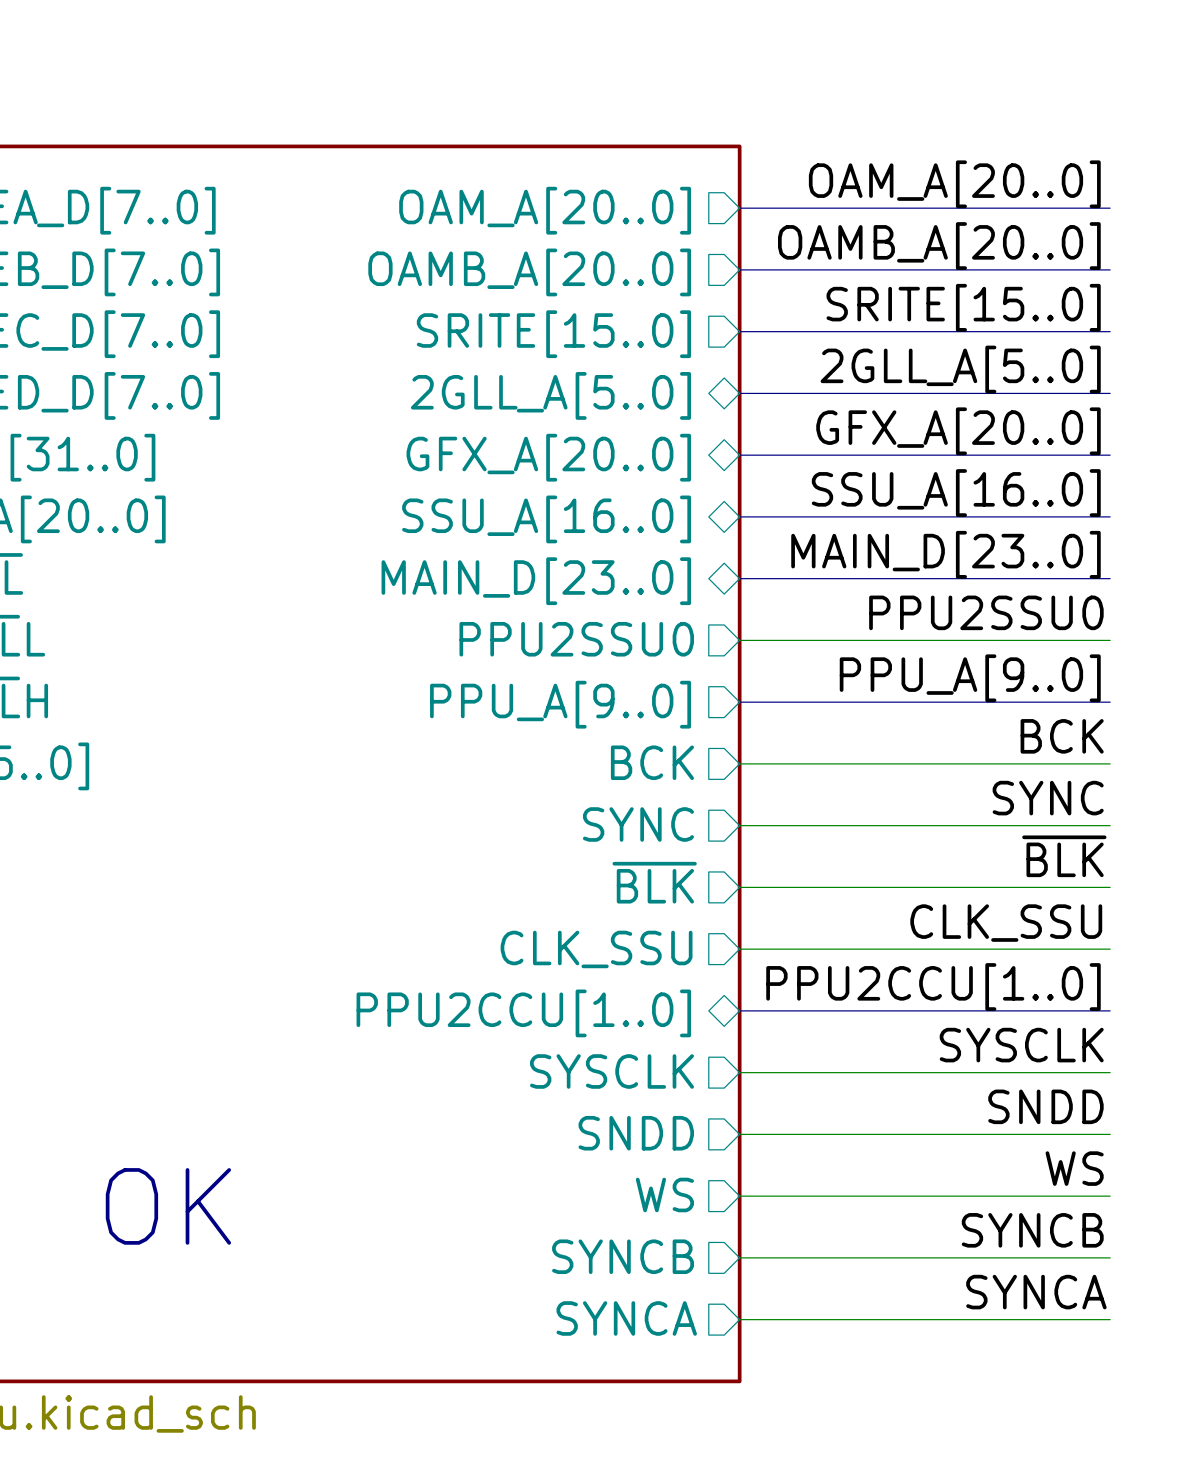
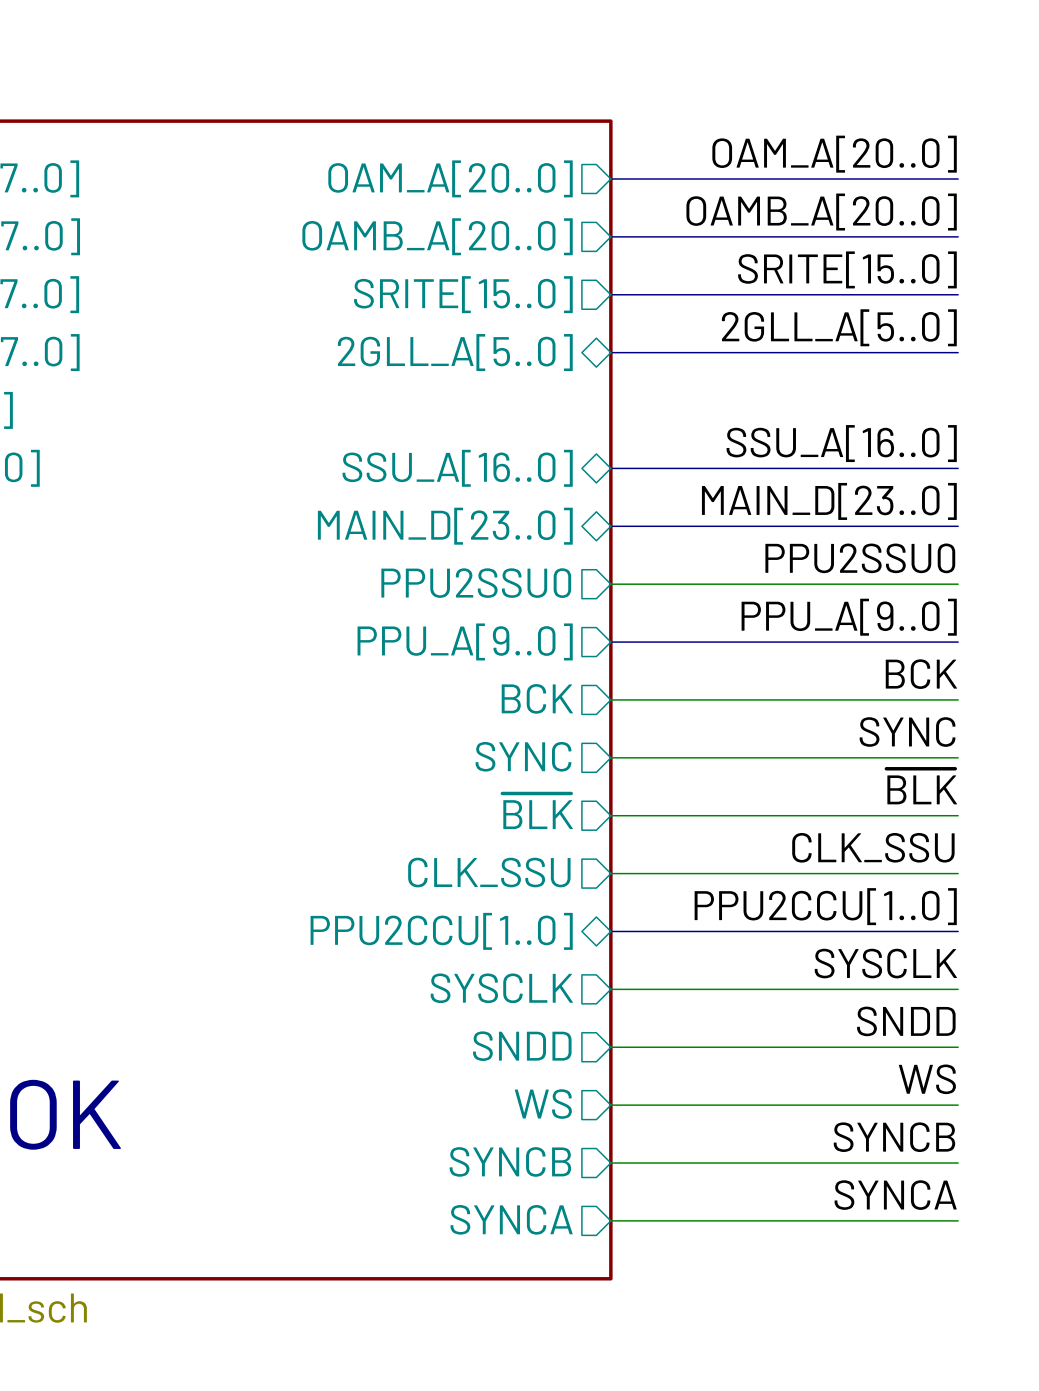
label: GFX_A[20..0] (958, 431) -> none
bus: (739, 455) (1110, 455) -> none
sheet pin: GFX_A[20..0] (548, 457) -> none

